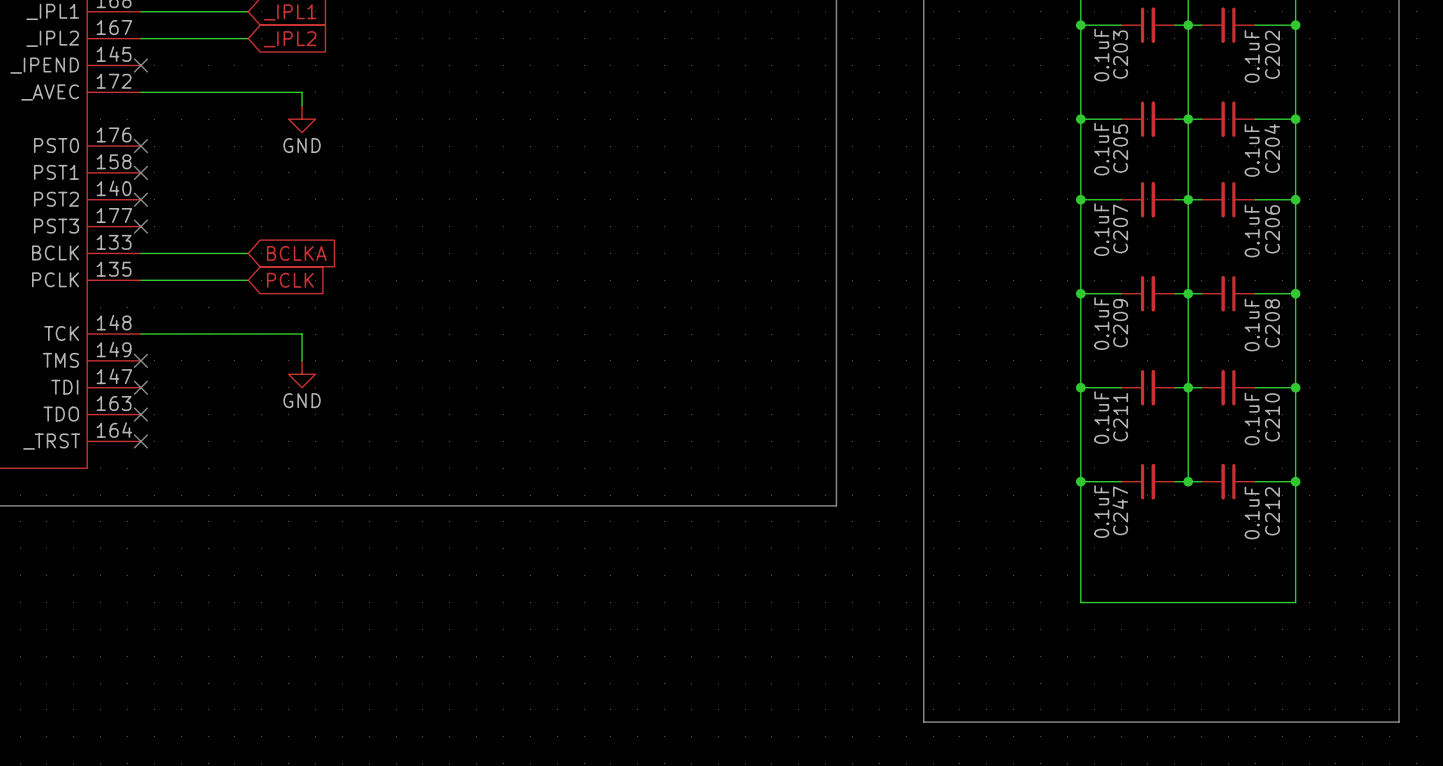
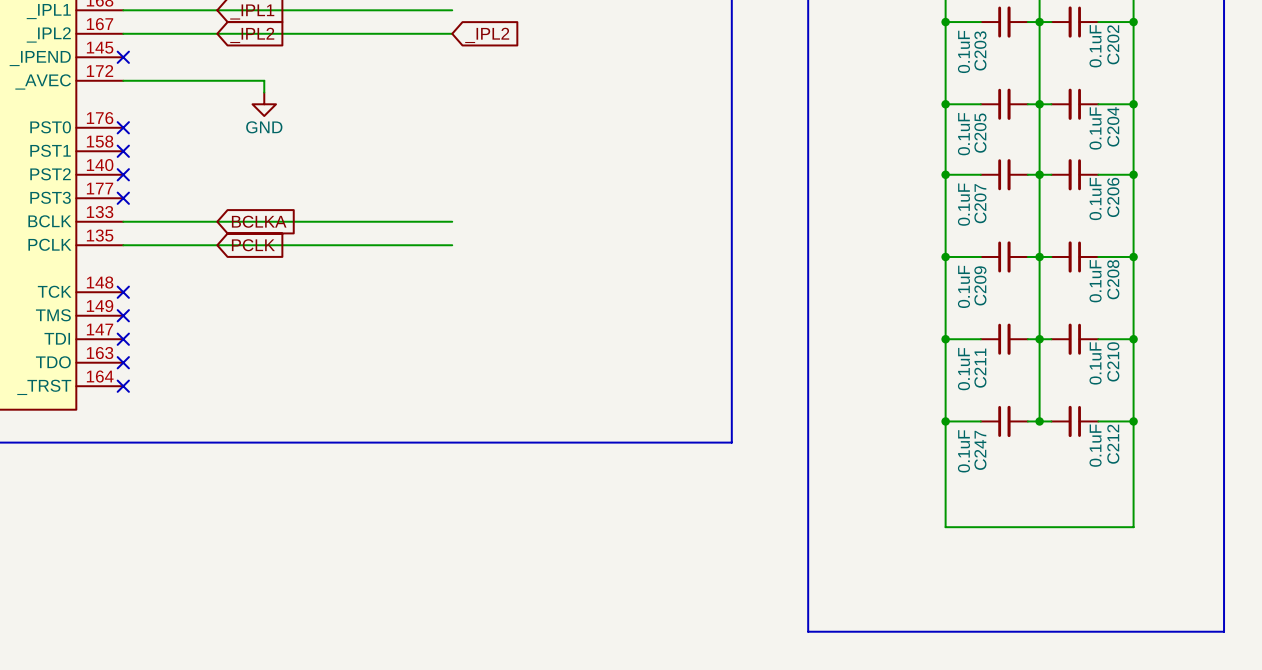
wire: none -> (217, 10) (452, 10)
wire: none -> (217, 33) (452, 33)
global label: none -> _IPL2 (487, 35)
wire: none -> (217, 221) (452, 221)
wire: none -> (217, 245) (452, 245)
wire: (140, 334) (302, 334) (302, 360) -> none
no-connect mark: none -> (123, 292)
power symbol: GND (302, 374) -> none

